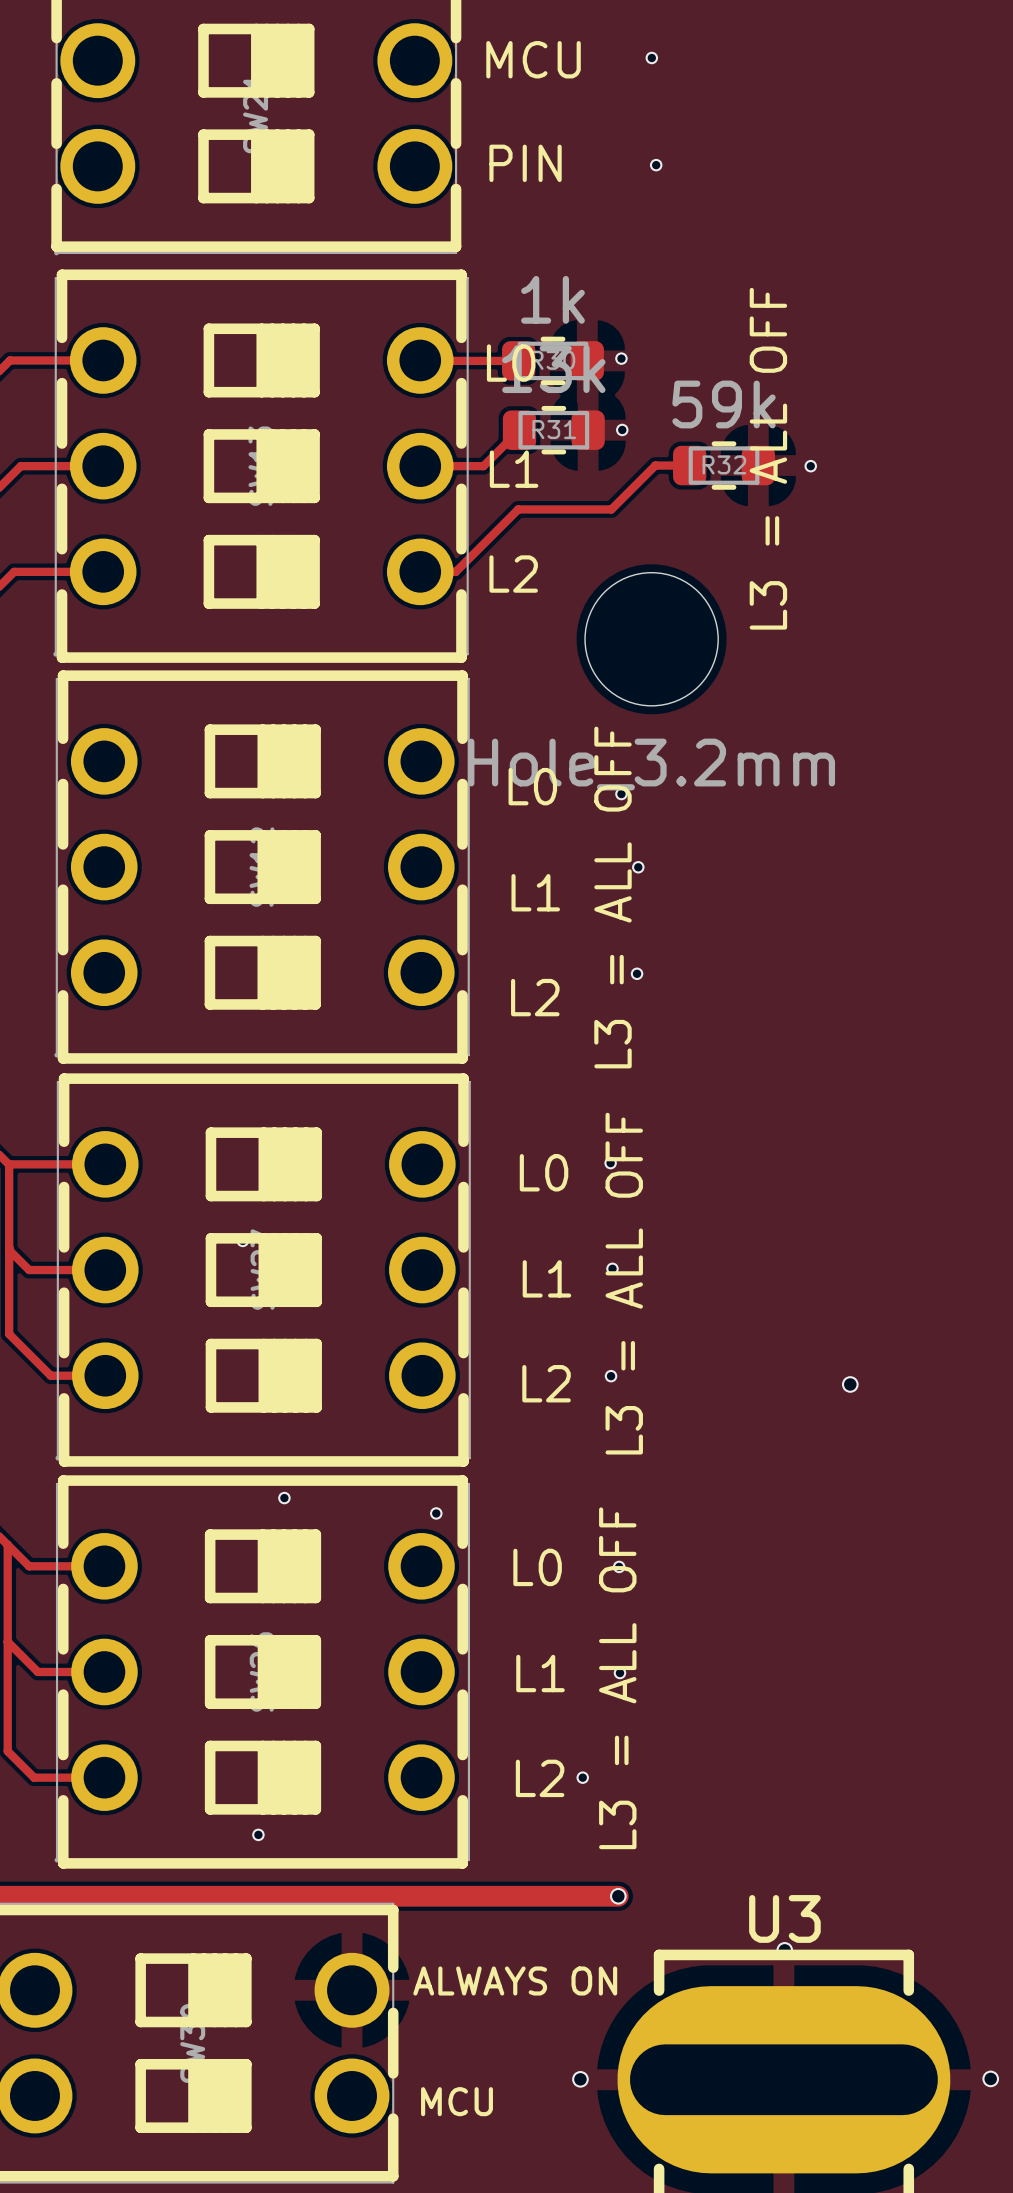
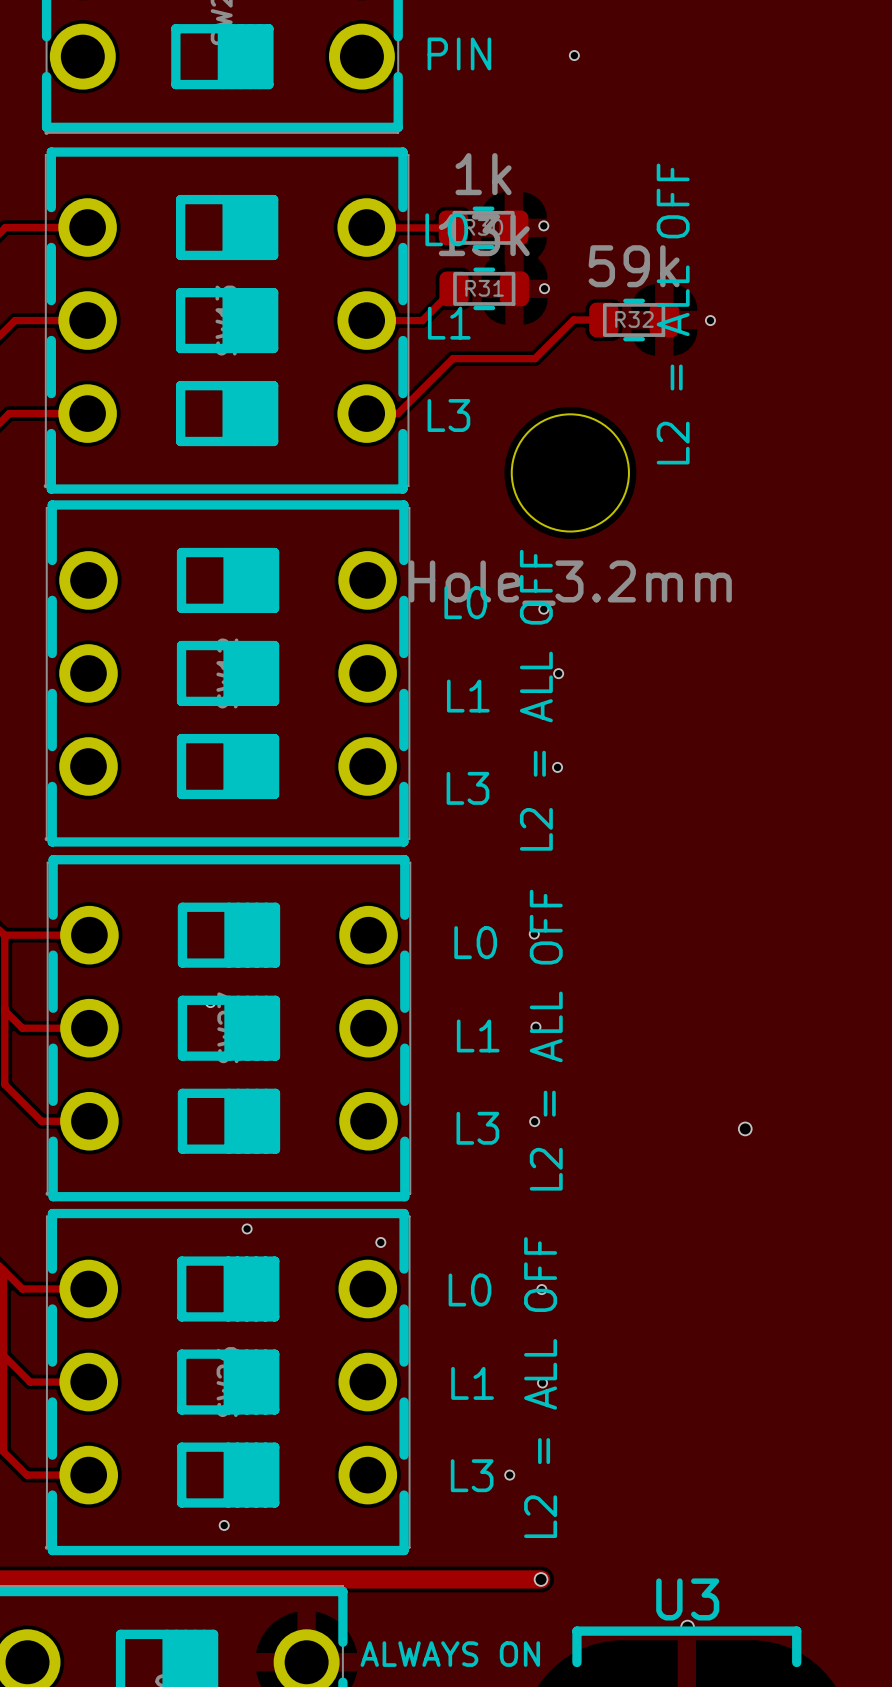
text: L3 = ALL OFF (768, 458) -> L2 = ALL OFF (673, 314)
text: L2 (513, 574) -> L3 (448, 415)
text: L3 = ALL OFF (613, 897) -> L2 = ALL OFF (536, 700)
text: L2 (535, 997) -> L3 (467, 788)
text: L3 = ALL OFF (624, 1283) -> L2 = ALL OFF (546, 1040)
text: L2 (546, 1383) -> L3 (477, 1128)
text: L3 = ALL OFF (617, 1678) -> L2 = ALL OFF (540, 1387)
text: L2 (540, 1778) -> L3 (472, 1475)

